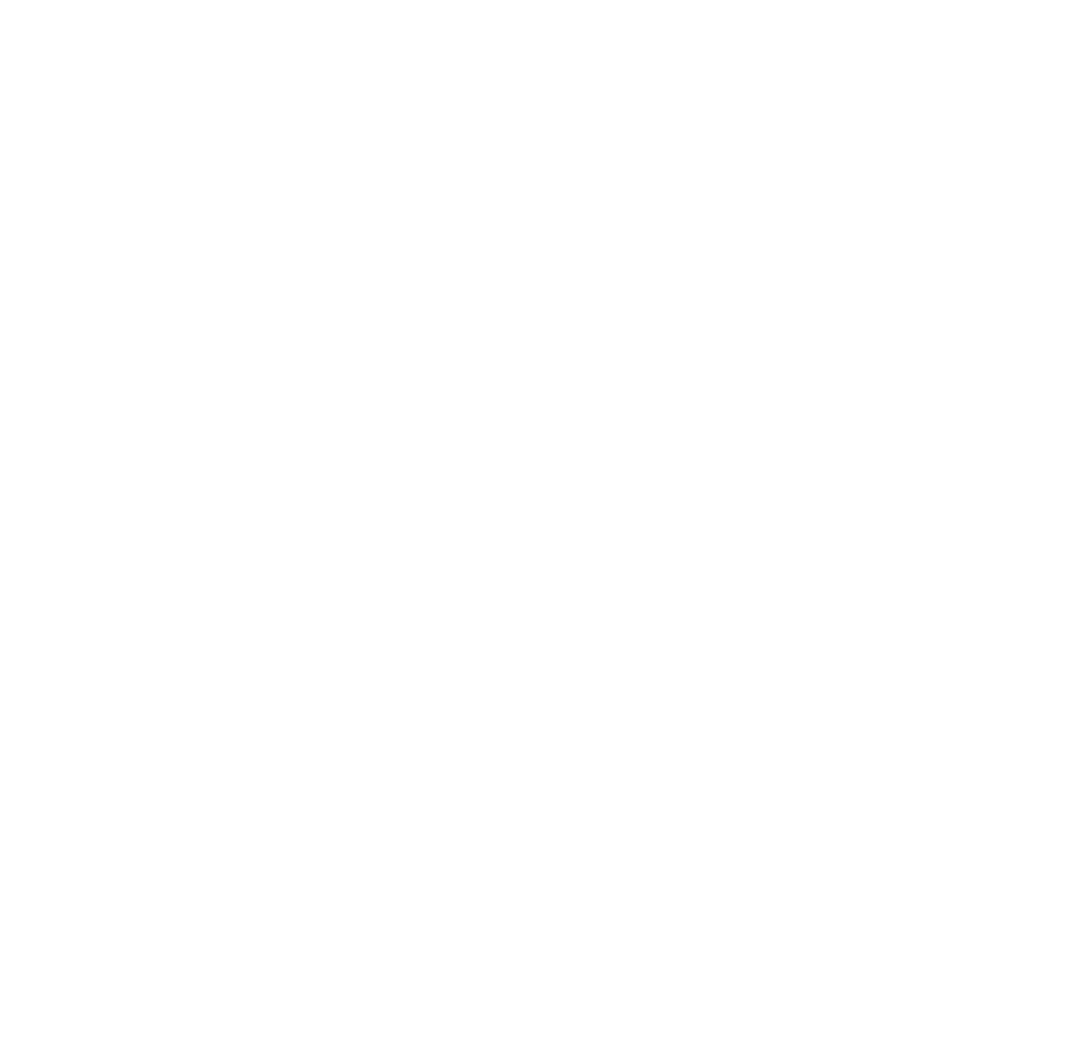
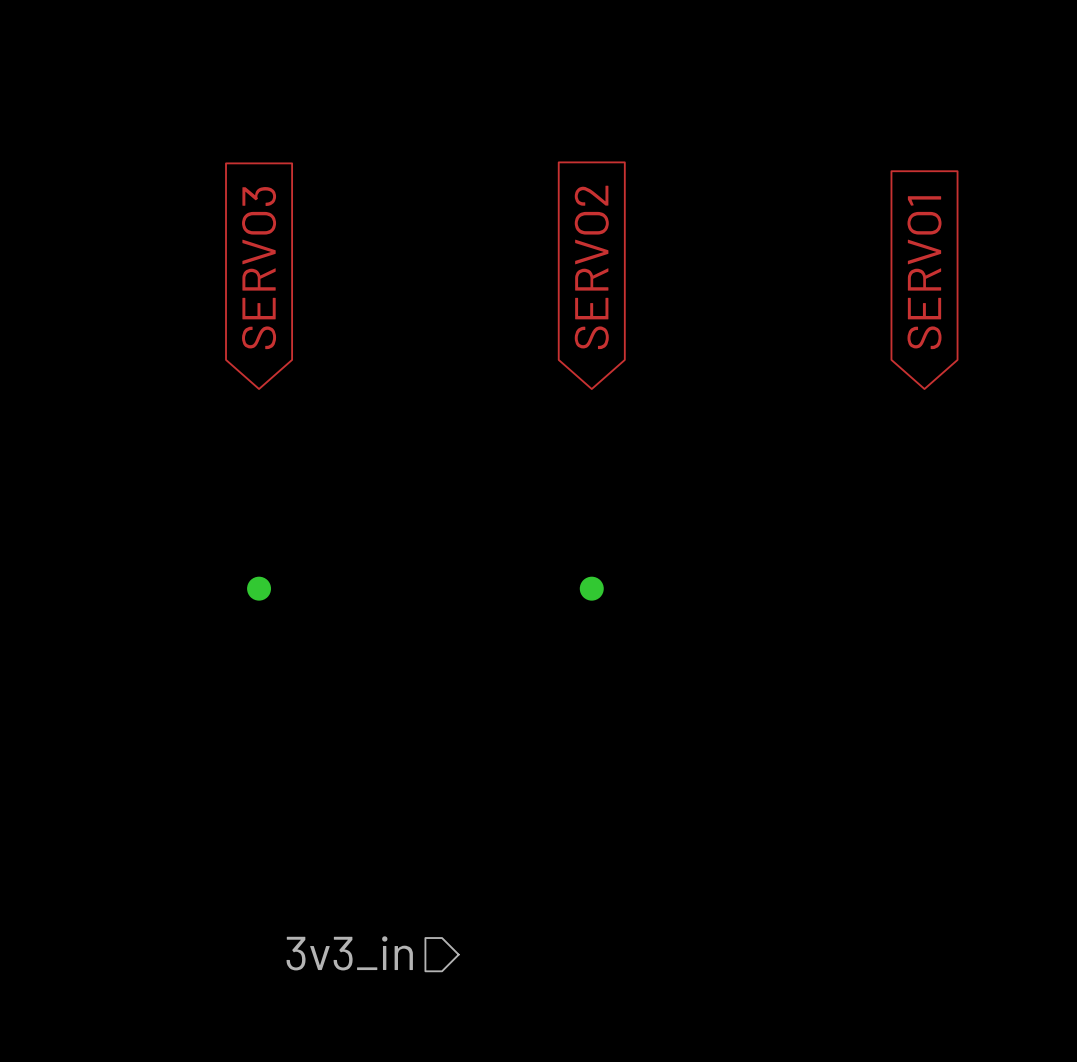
global label: none -> SERVO2 (591, 267)
global label: none -> SERVO3 (259, 268)
global label: none -> SERVO1 (924, 272)
junction: none -> (259, 588)
junction: none -> (591, 588)
hierarchical label: none -> 3v3_in (349, 953)

